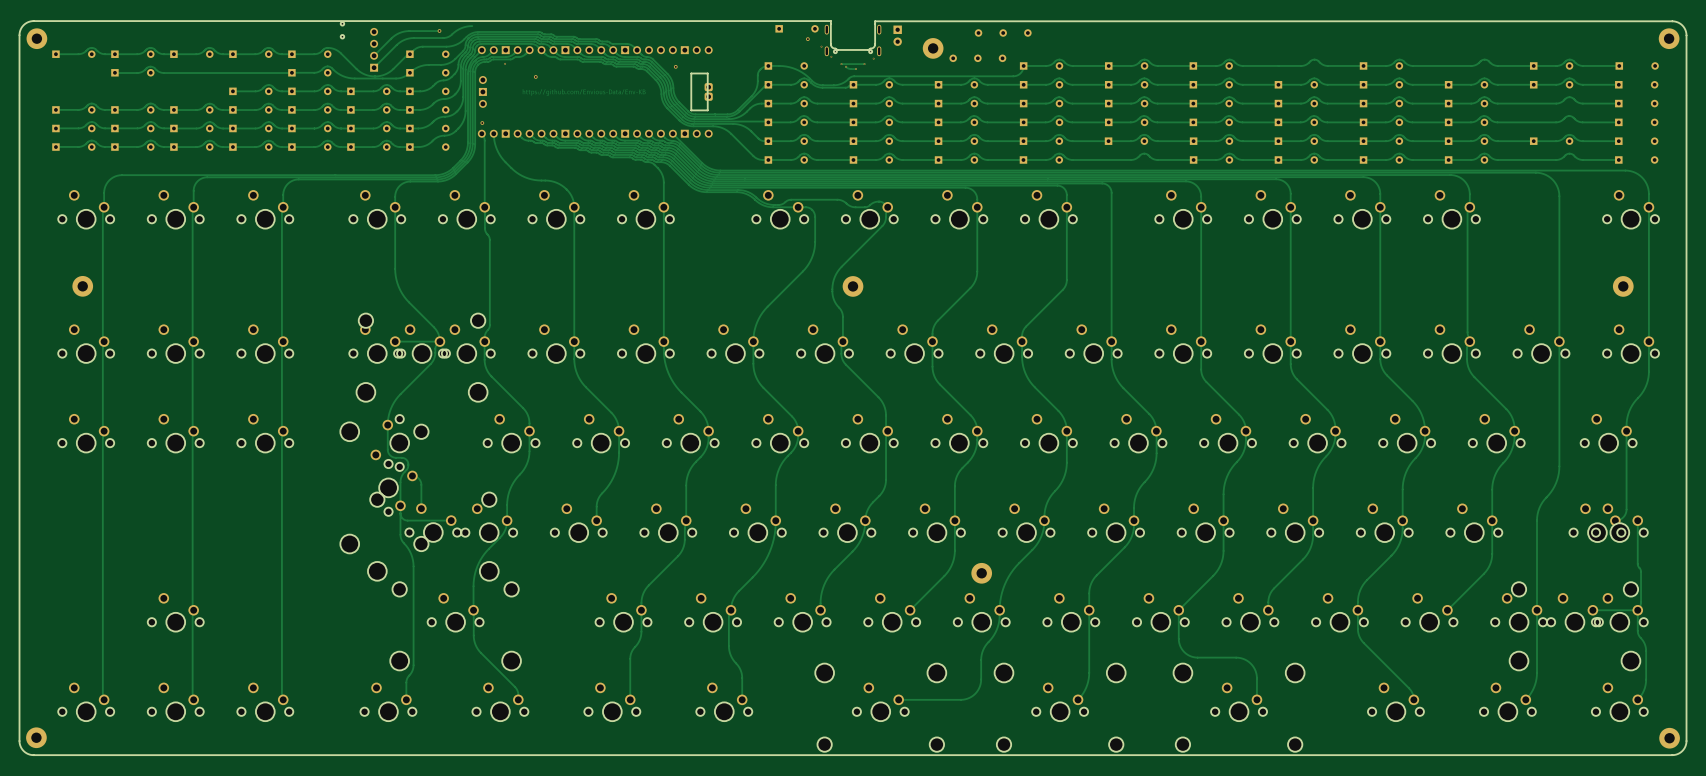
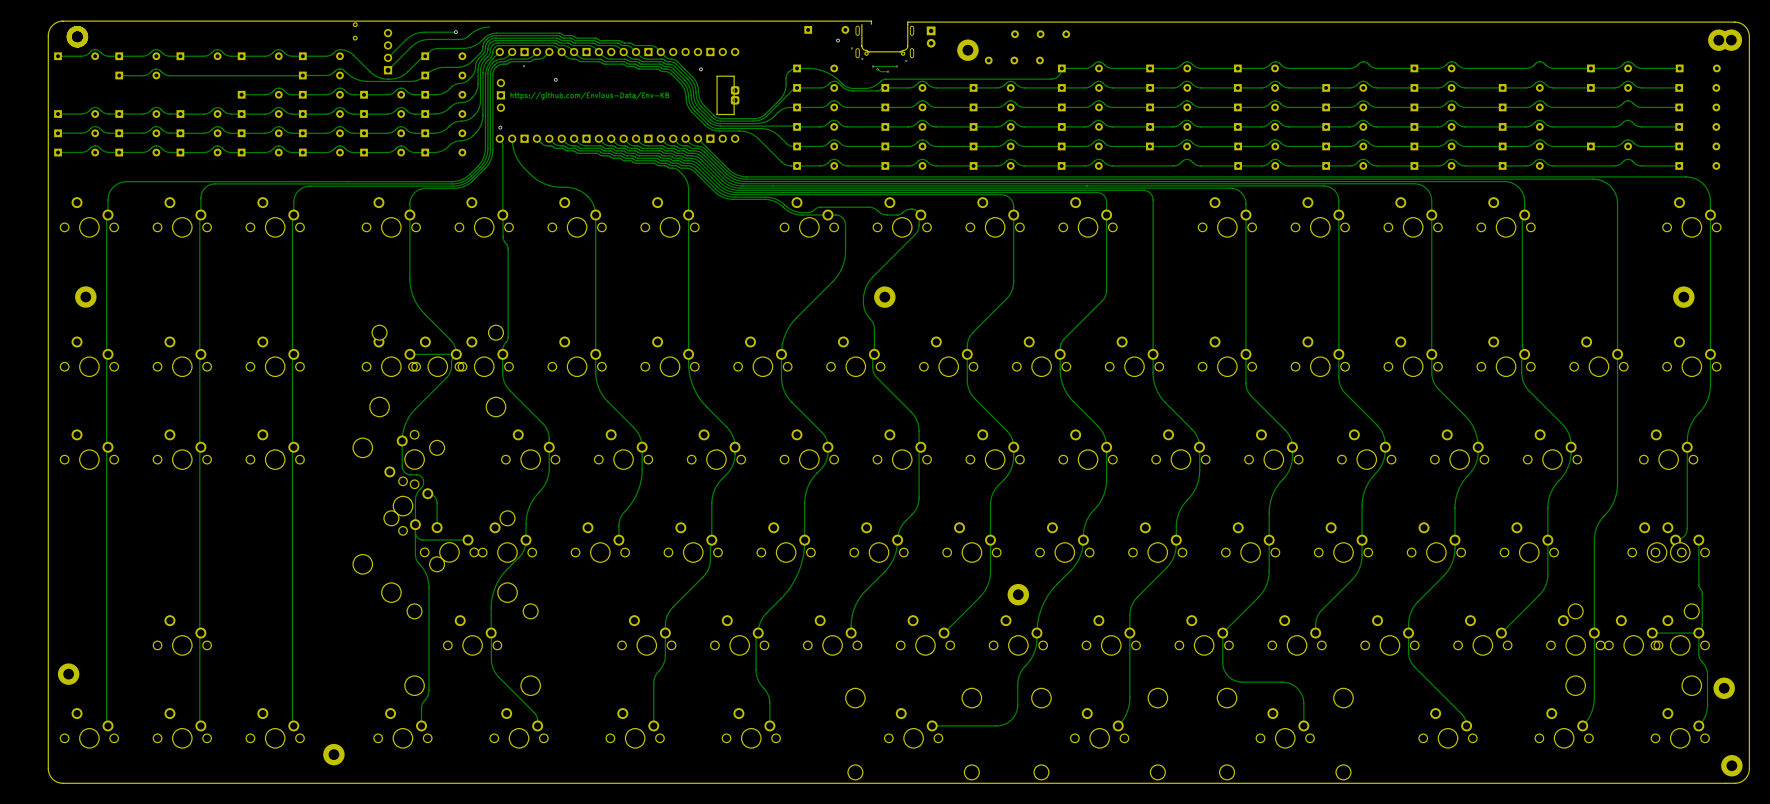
board edge: (830, 23) (830, 21) (33, 21) (23, 25) (19, 35) (19, 741) (22, 749) (28, 754) (60, 755) -> (871, 24) (871, 21) (62, 21) (52, 25) (48, 35) (48, 768) (52, 779) (62, 783)
part position: (36, 38) -> (77, 36)
part: none -> (1718, 40)
part: none -> (1724, 688)
part: none -> (333, 754)
part position: (36, 737) -> (68, 674)

